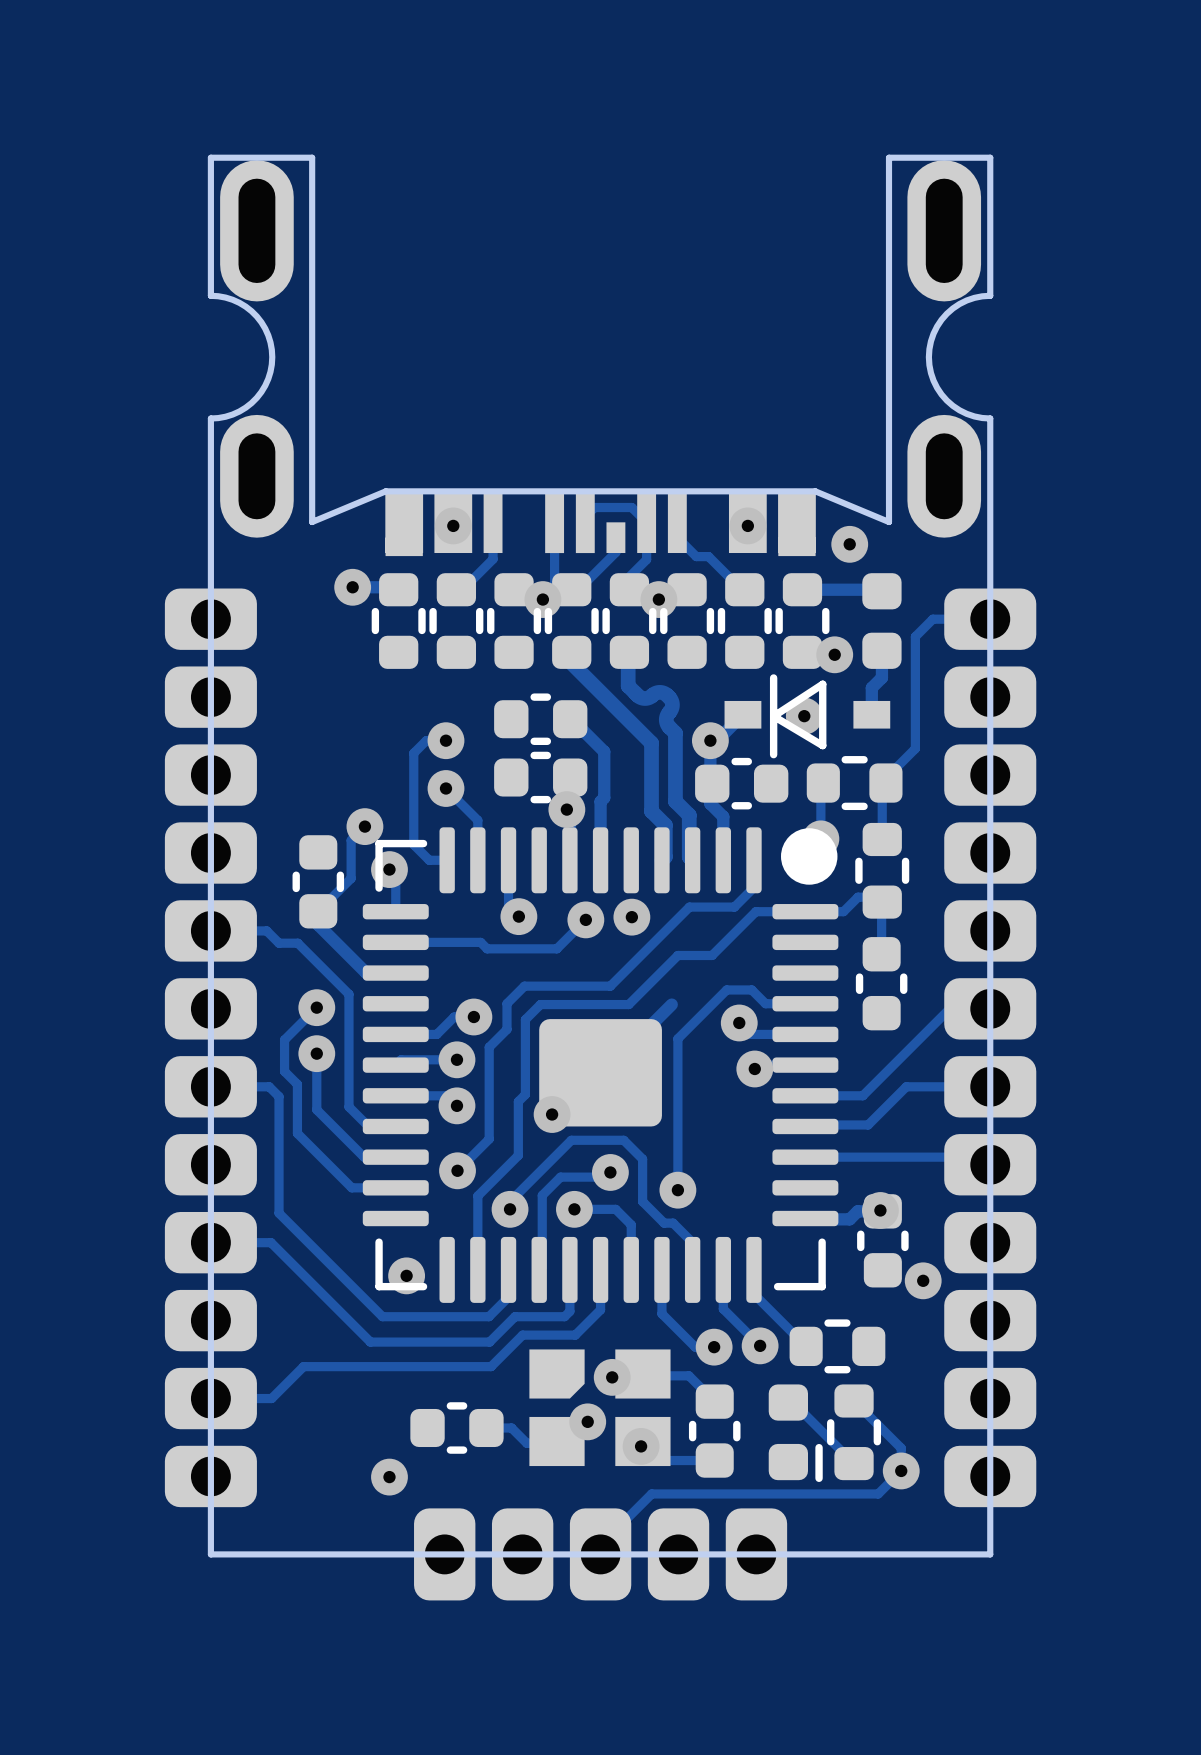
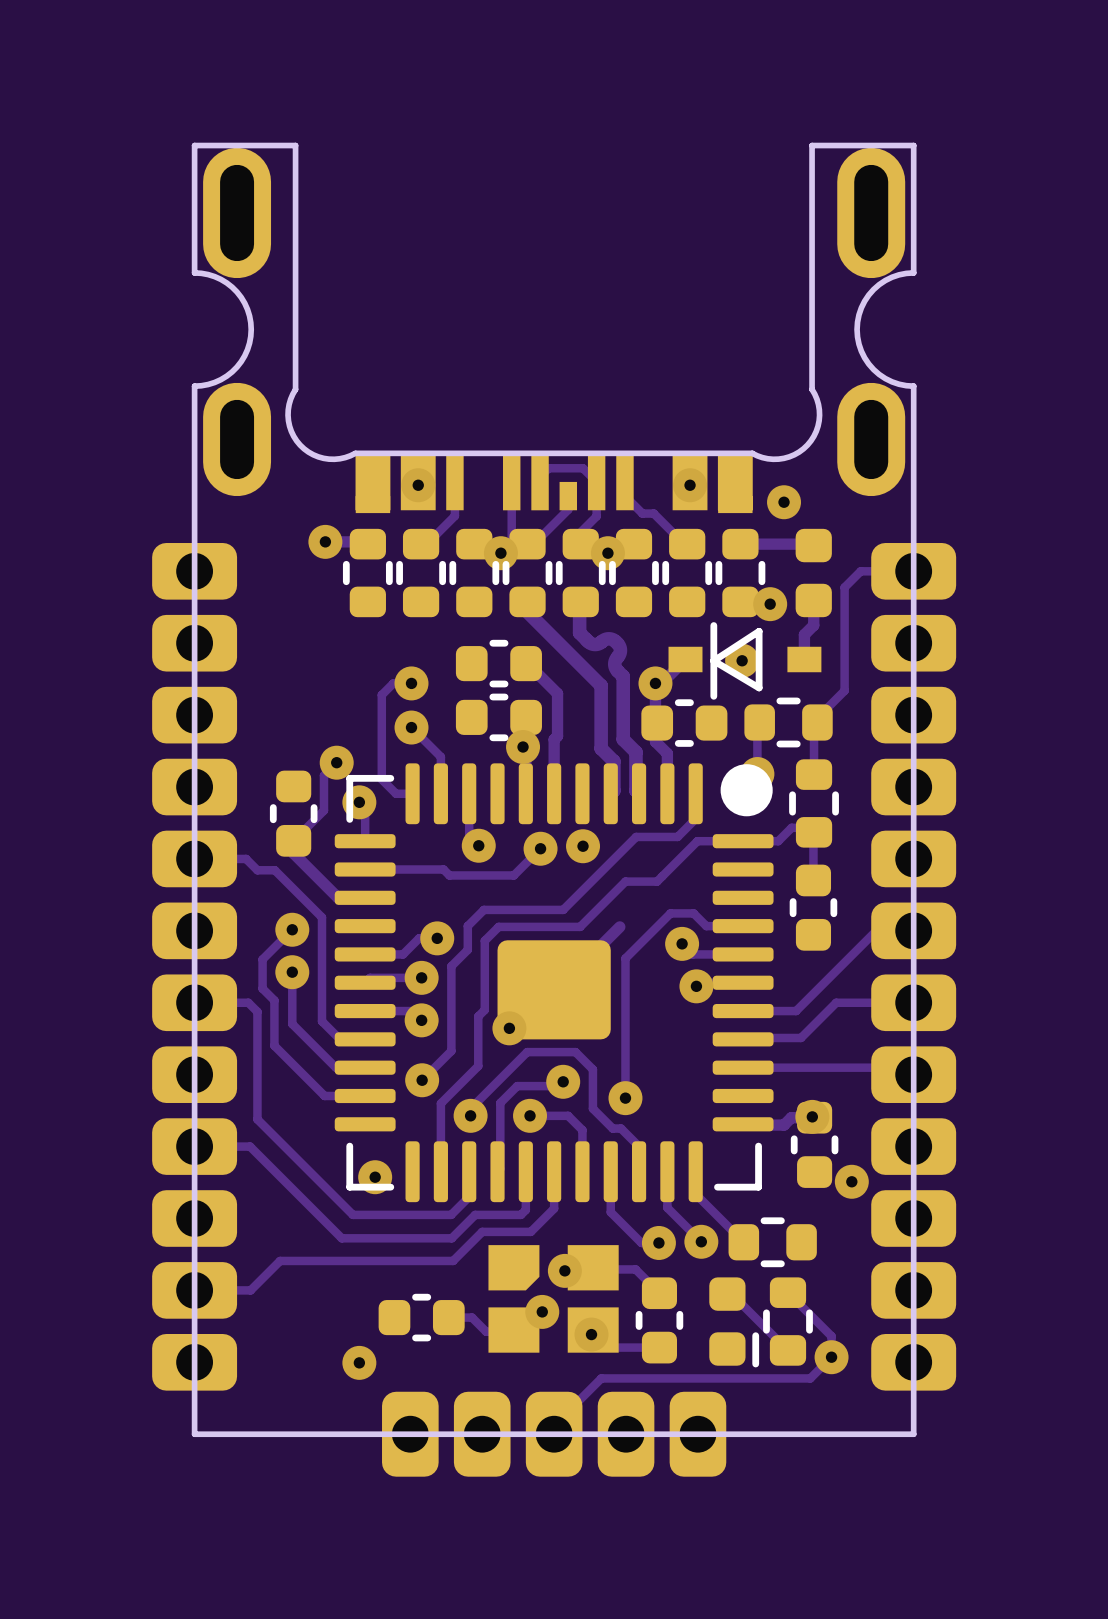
board edge: (312, 157) (312, 522) (385, 491) -> (288, 145) (295, 145) (295, 389) (289, 404) (289, 426) (300, 445) (318, 456) (334, 459) (355, 453)
board edge: (889, 157) (889, 522) (815, 491) -> (820, 145) (812, 145) (812, 389) (818, 404) (818, 426) (807, 445) (794, 454) (773, 459) (752, 453)

